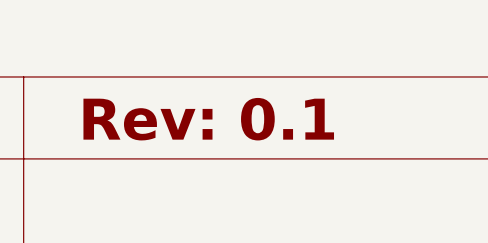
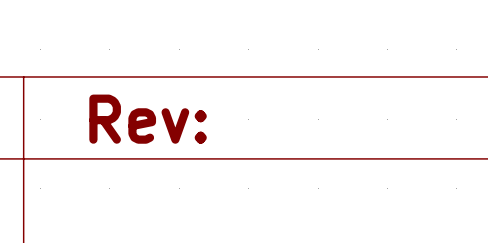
title block: Rev: 0.1 (208, 119) -> Rev: (148, 119)

